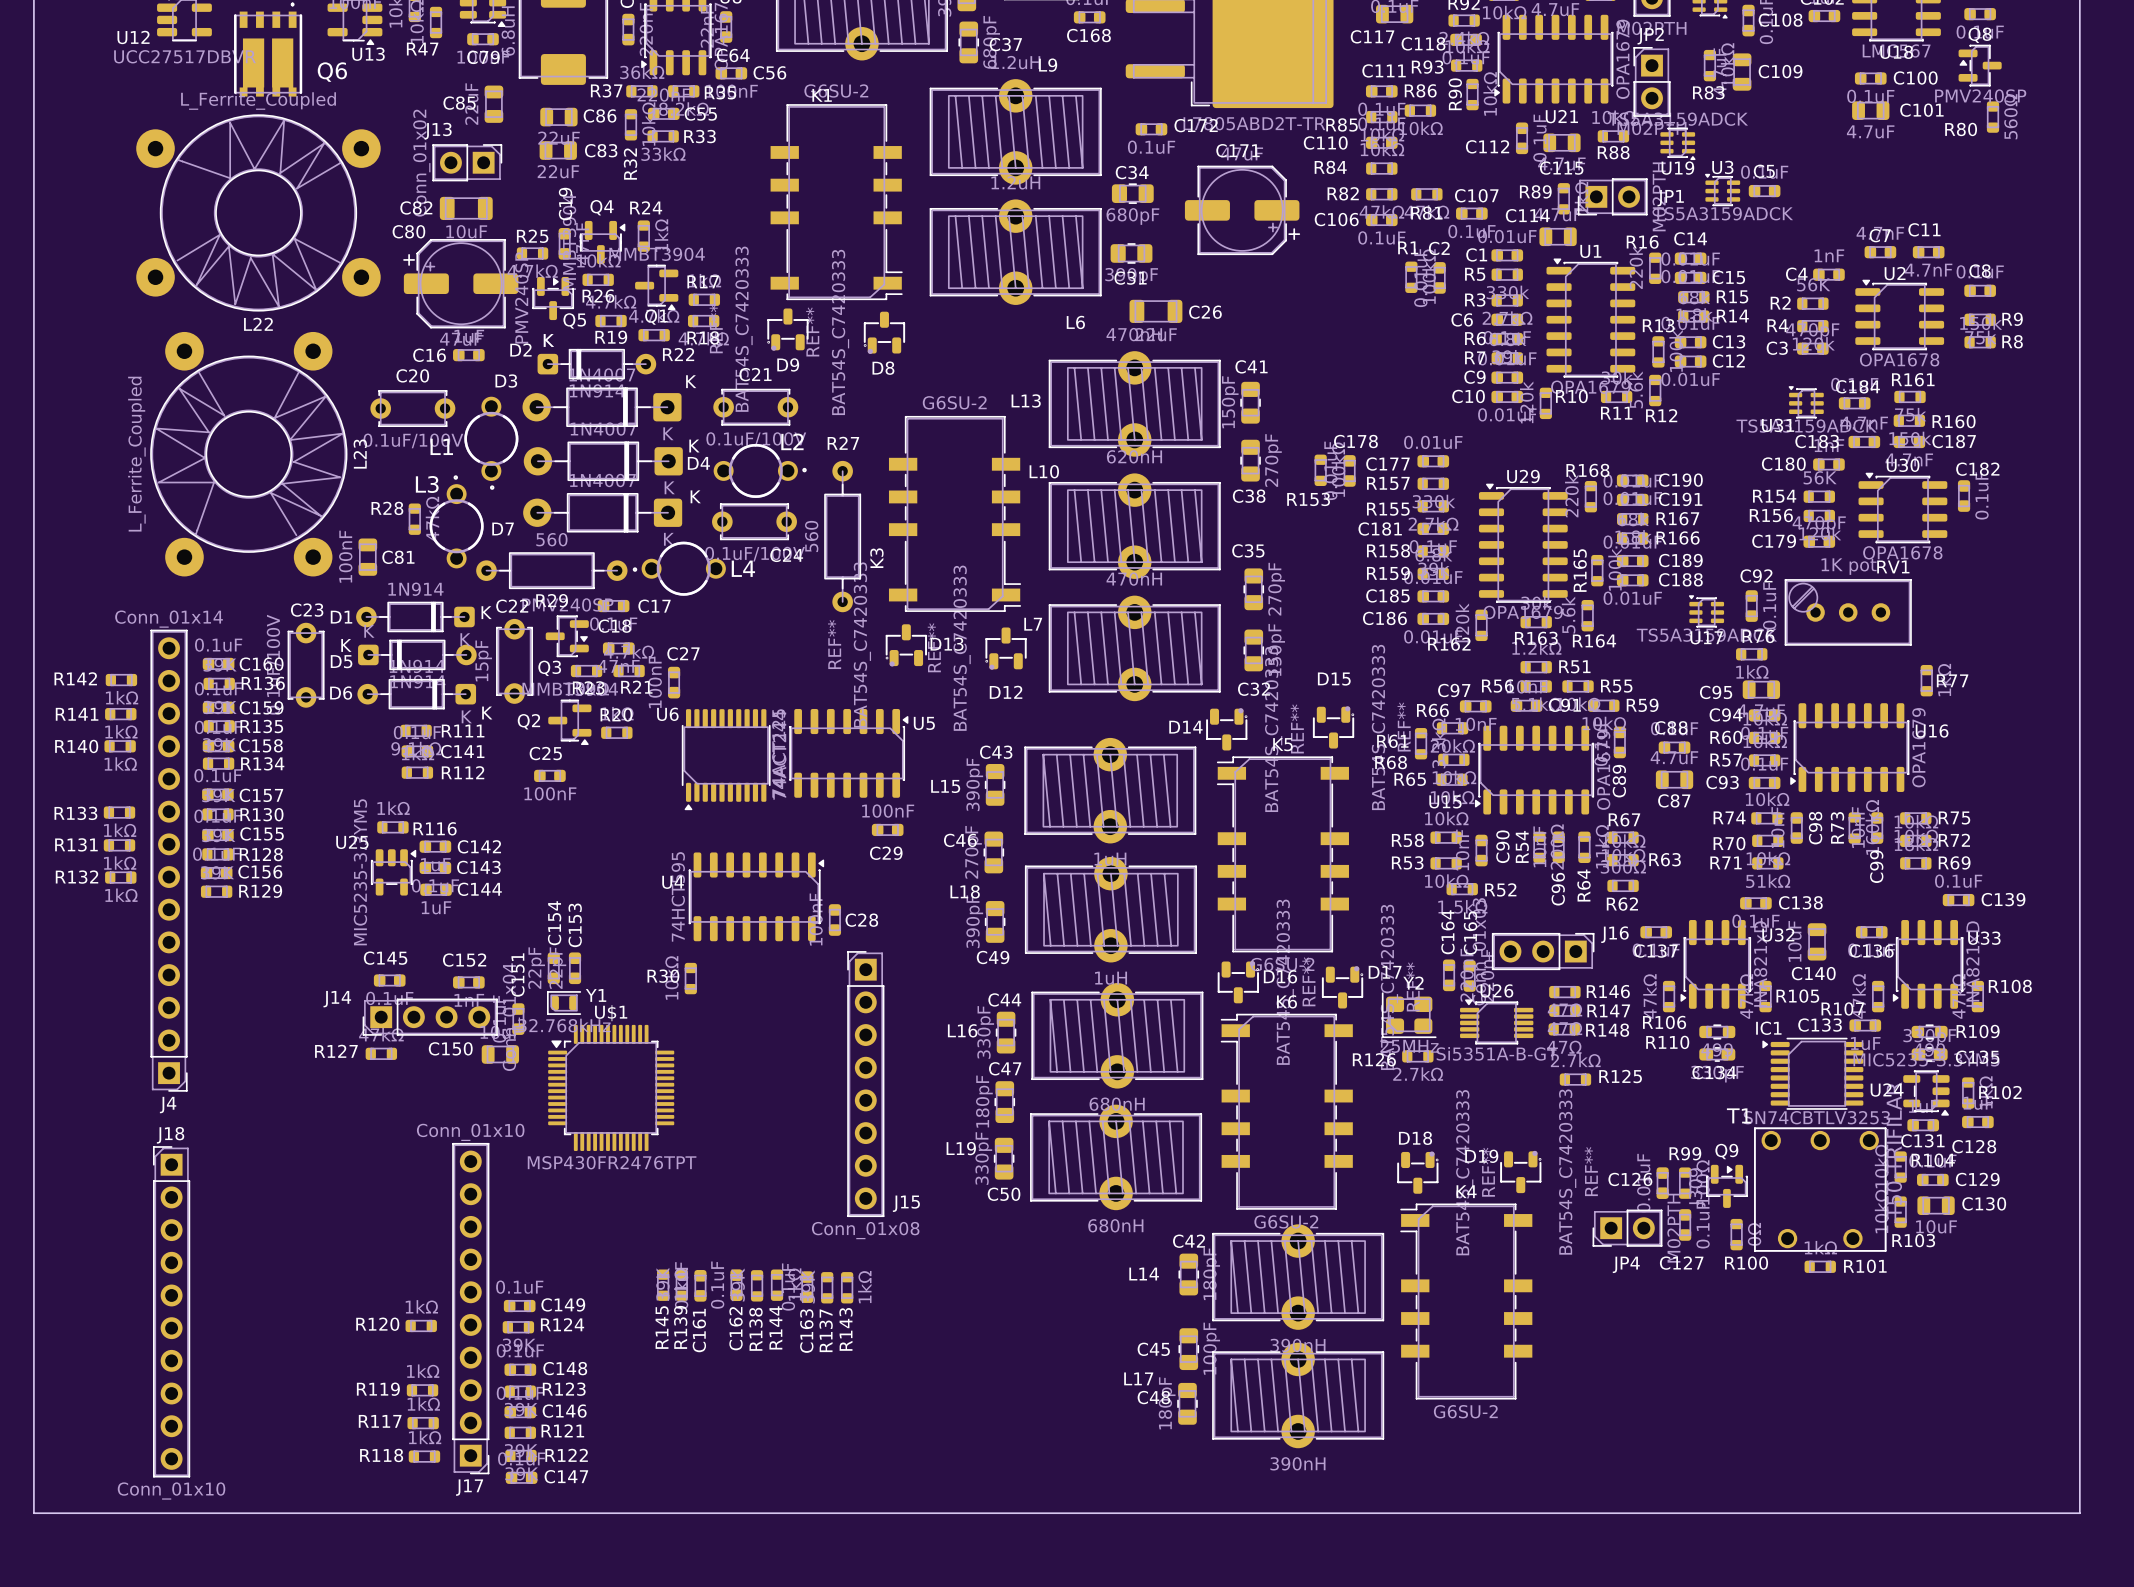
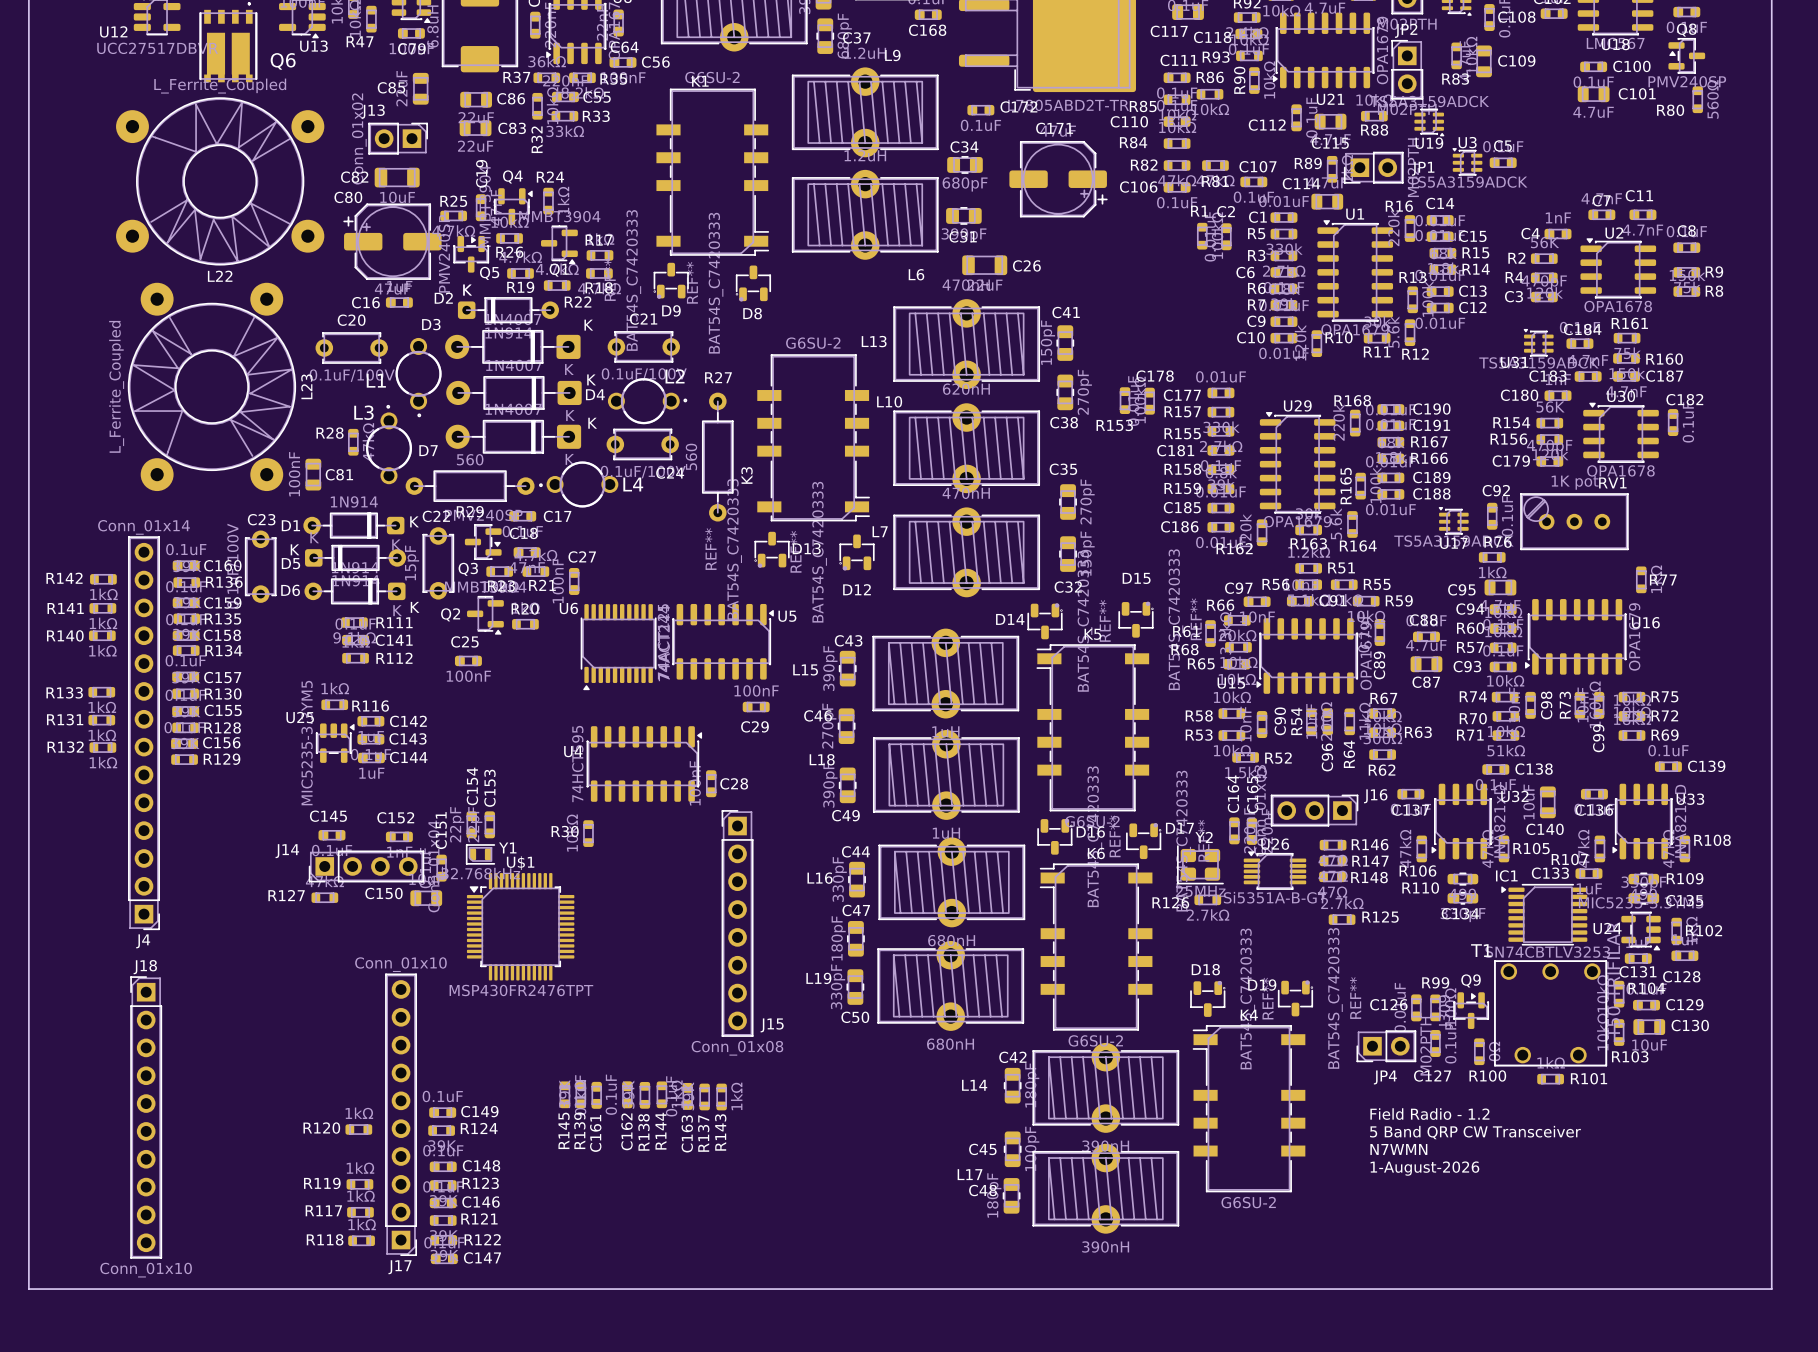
text: none -> Field Radio - 1.2 (1429, 1114)
text: none -> 5 Band QRP CW Transceiver (1475, 1132)
text: none -> N7WMN (1398, 1149)
text: none -> 1-August-2026 (1424, 1168)

